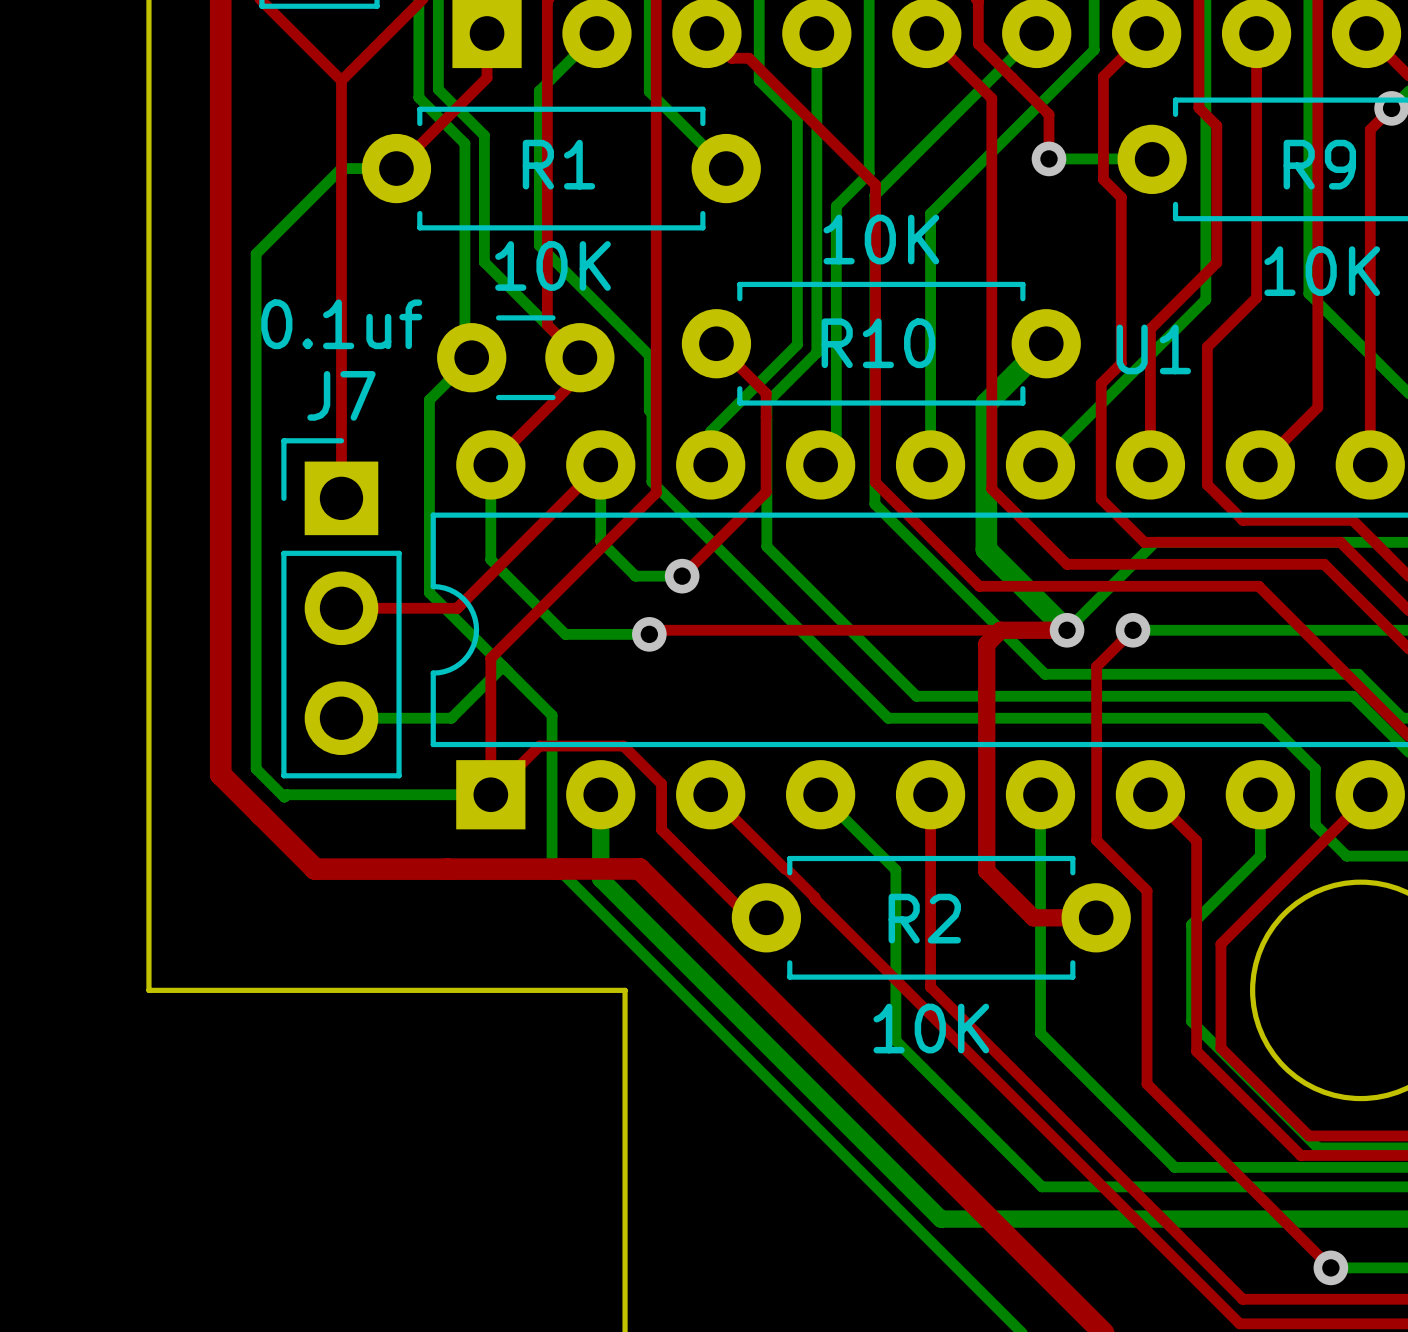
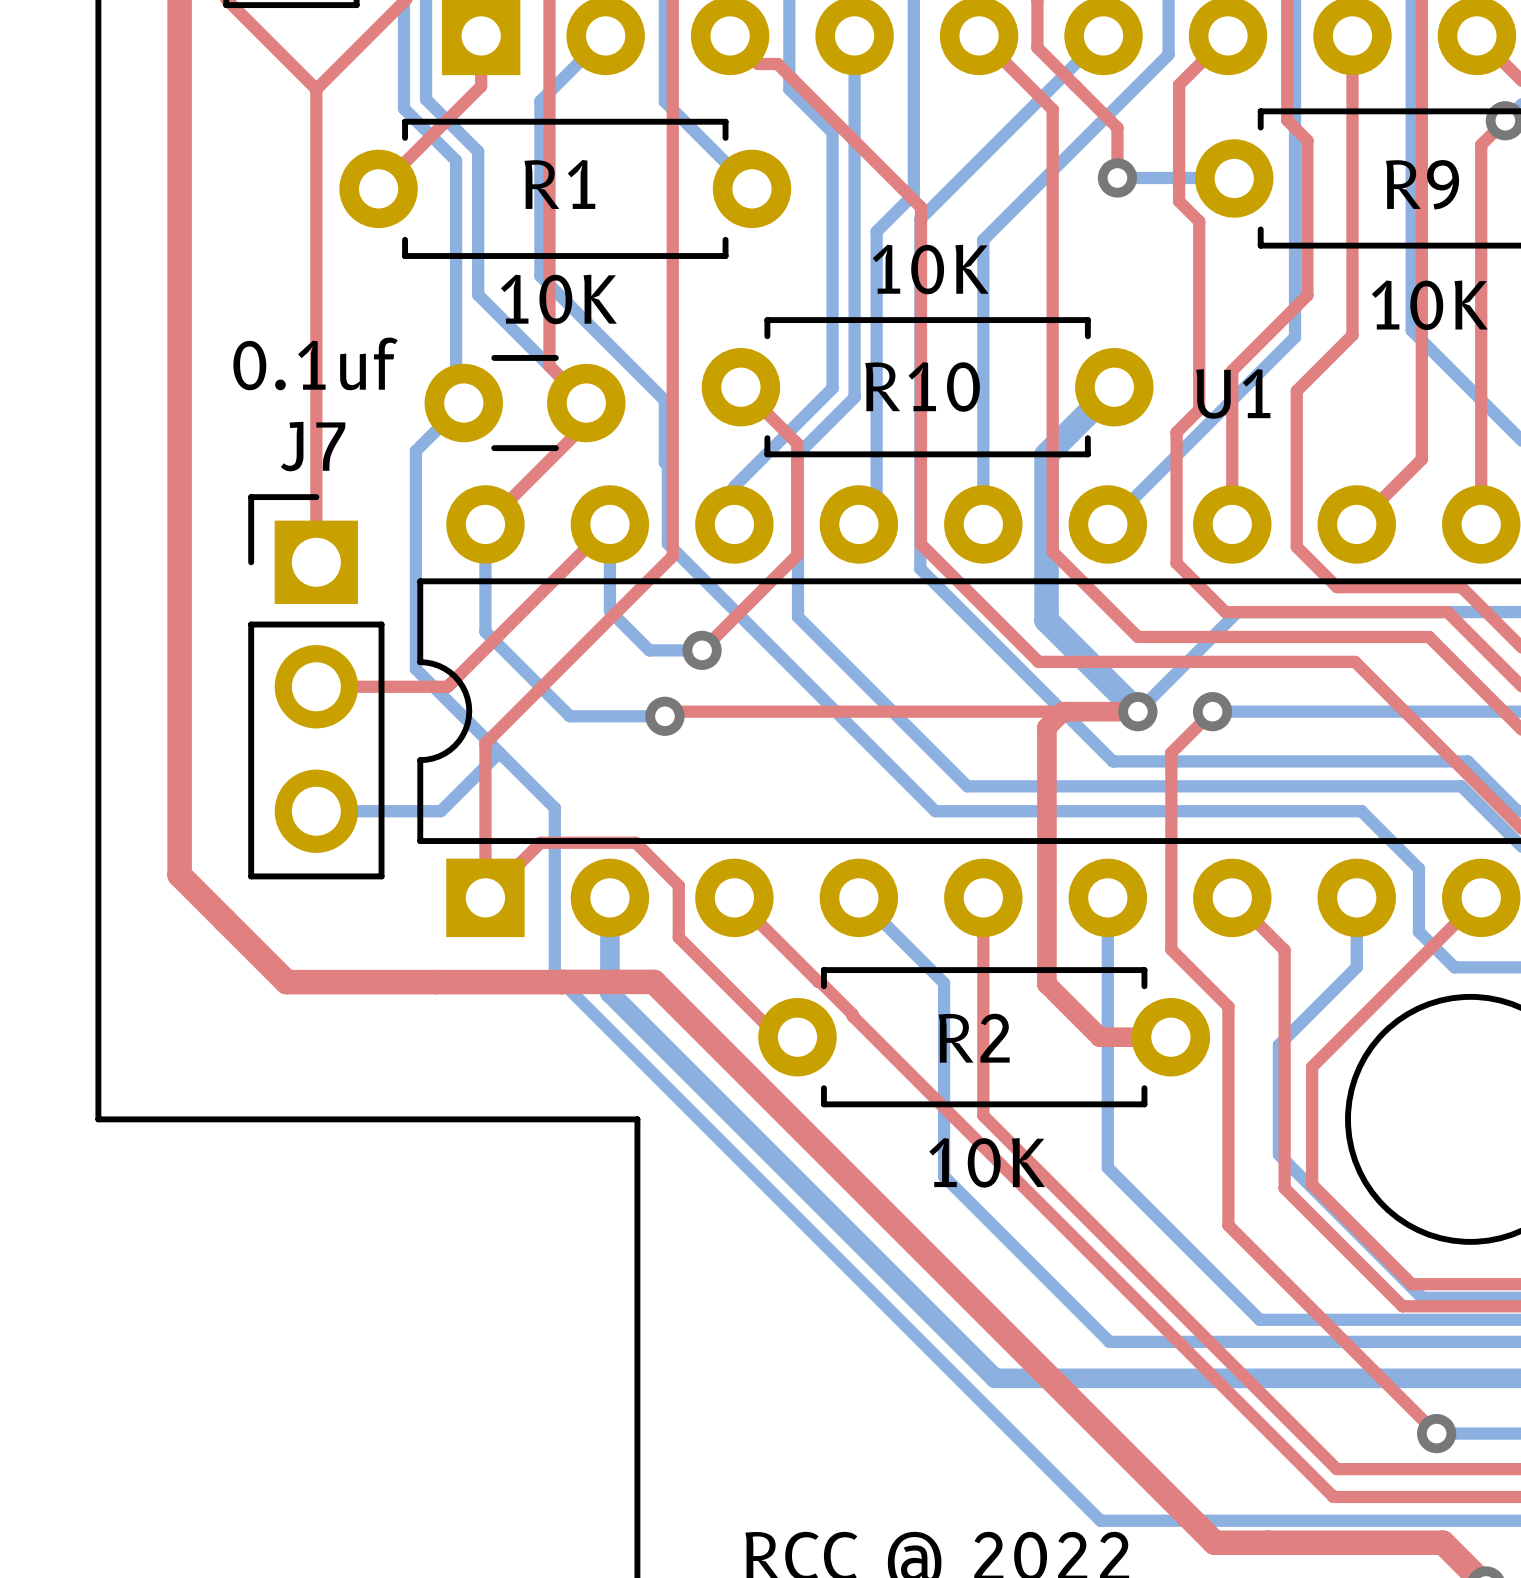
bottom track: (396, 168) (341, 168) (256, 253) (256, 768) (284, 797) (286, 794) (490, 794) -> none

